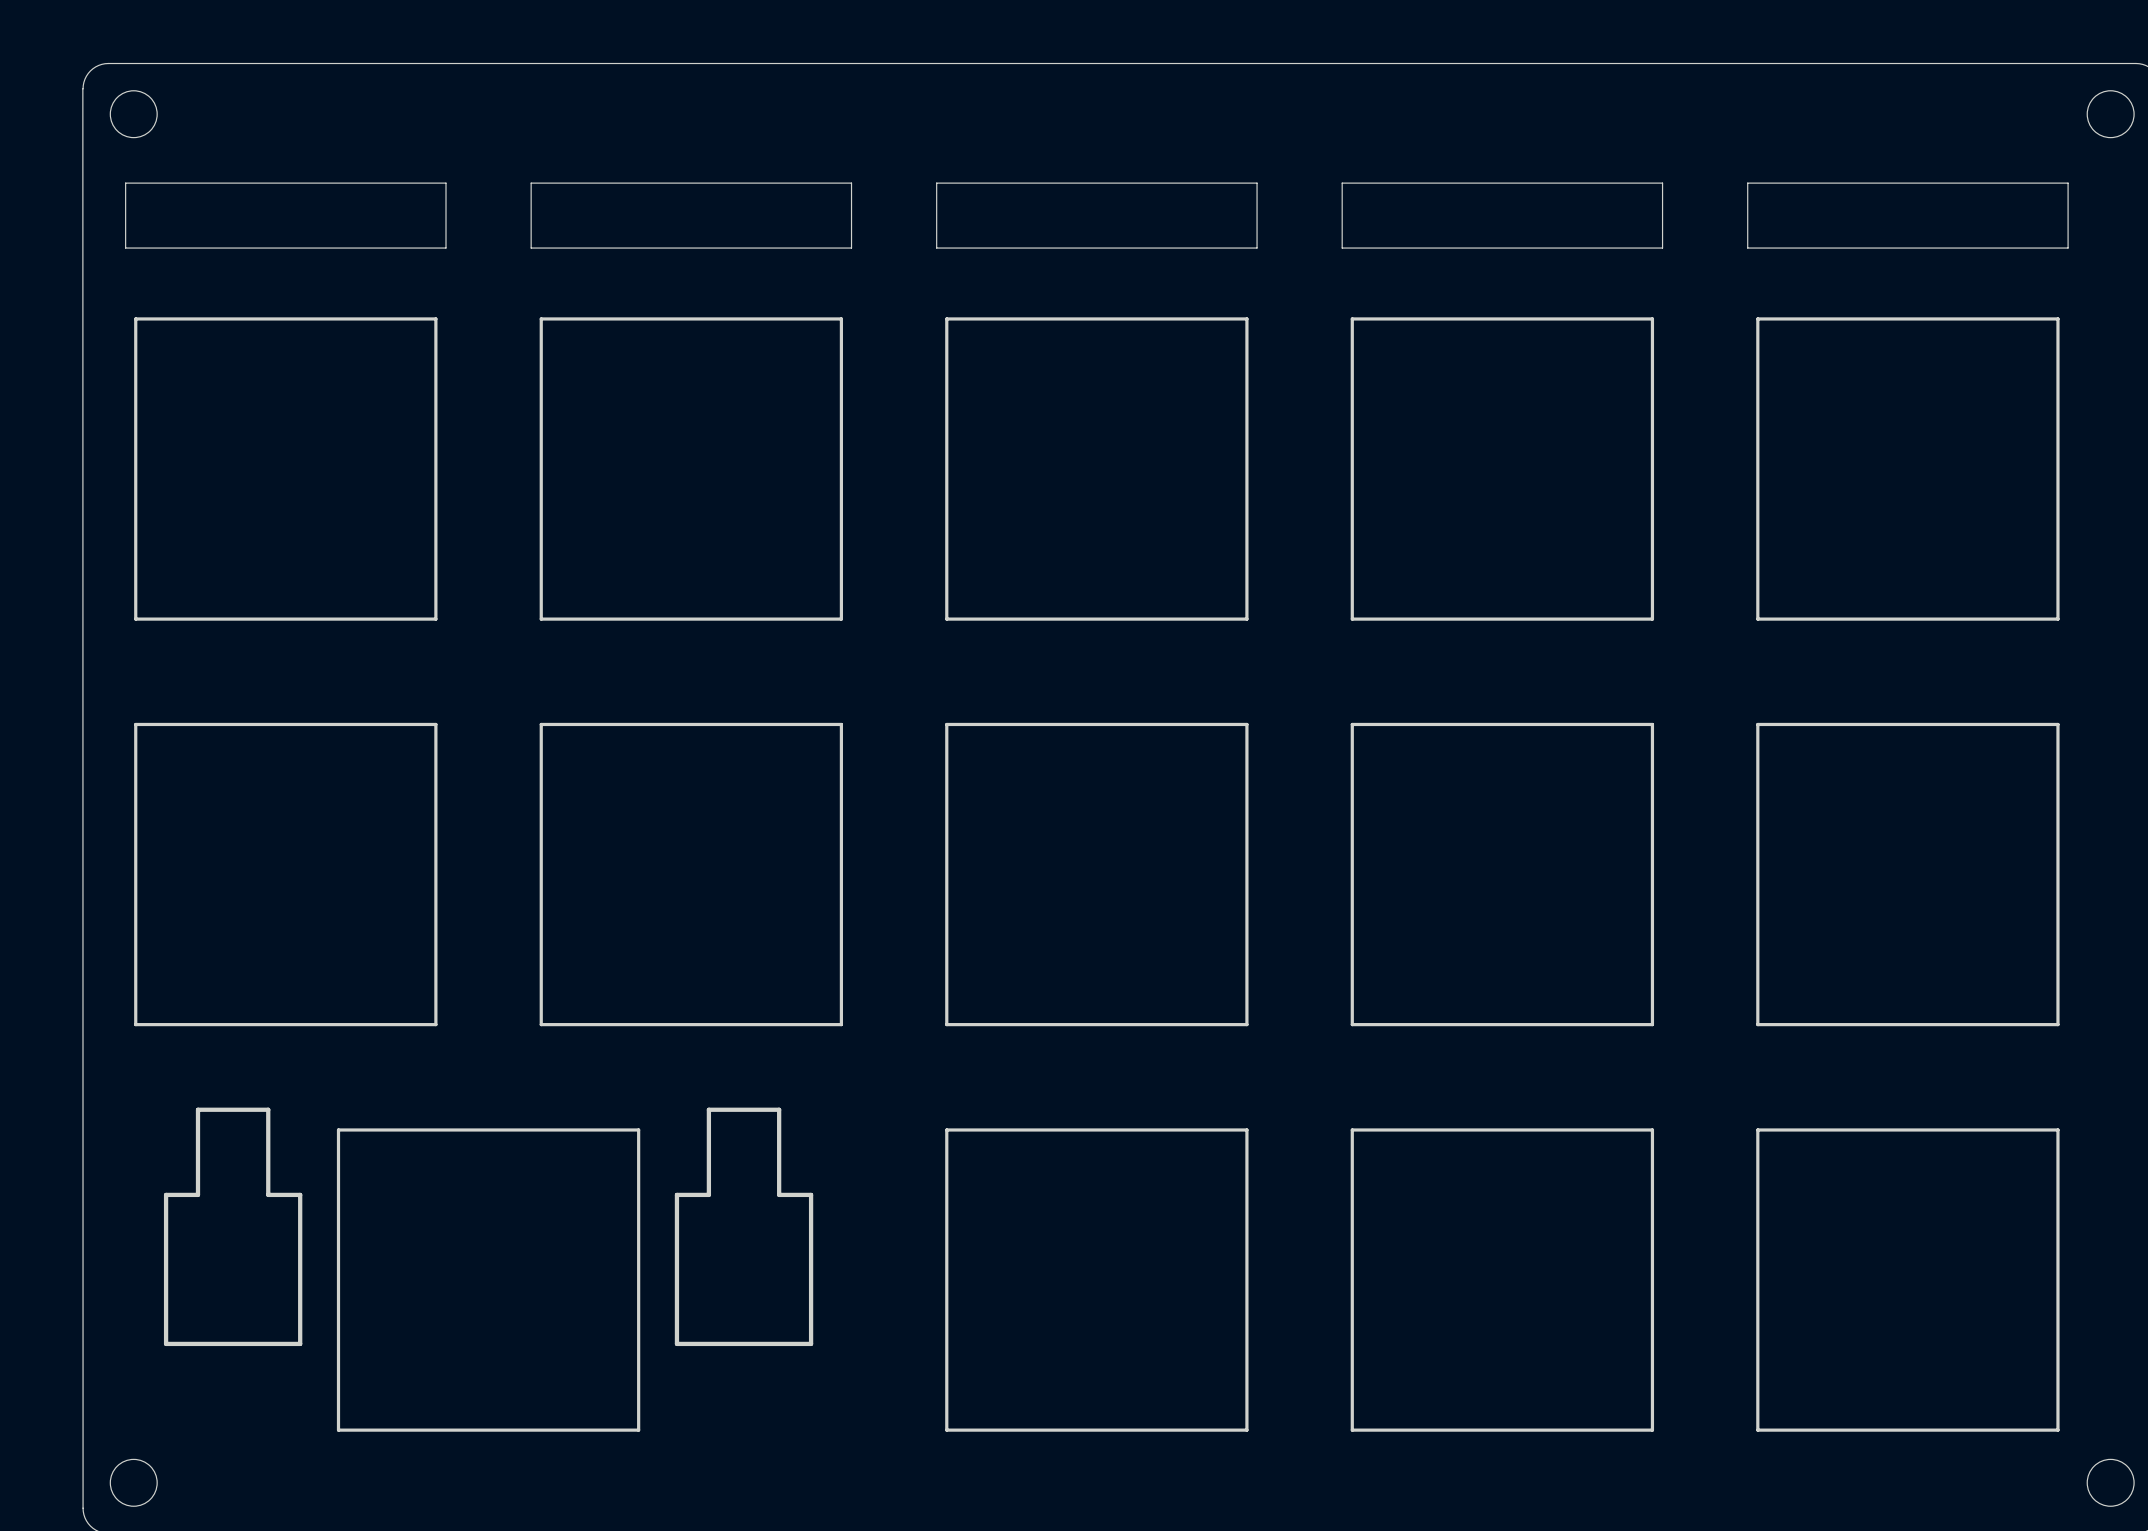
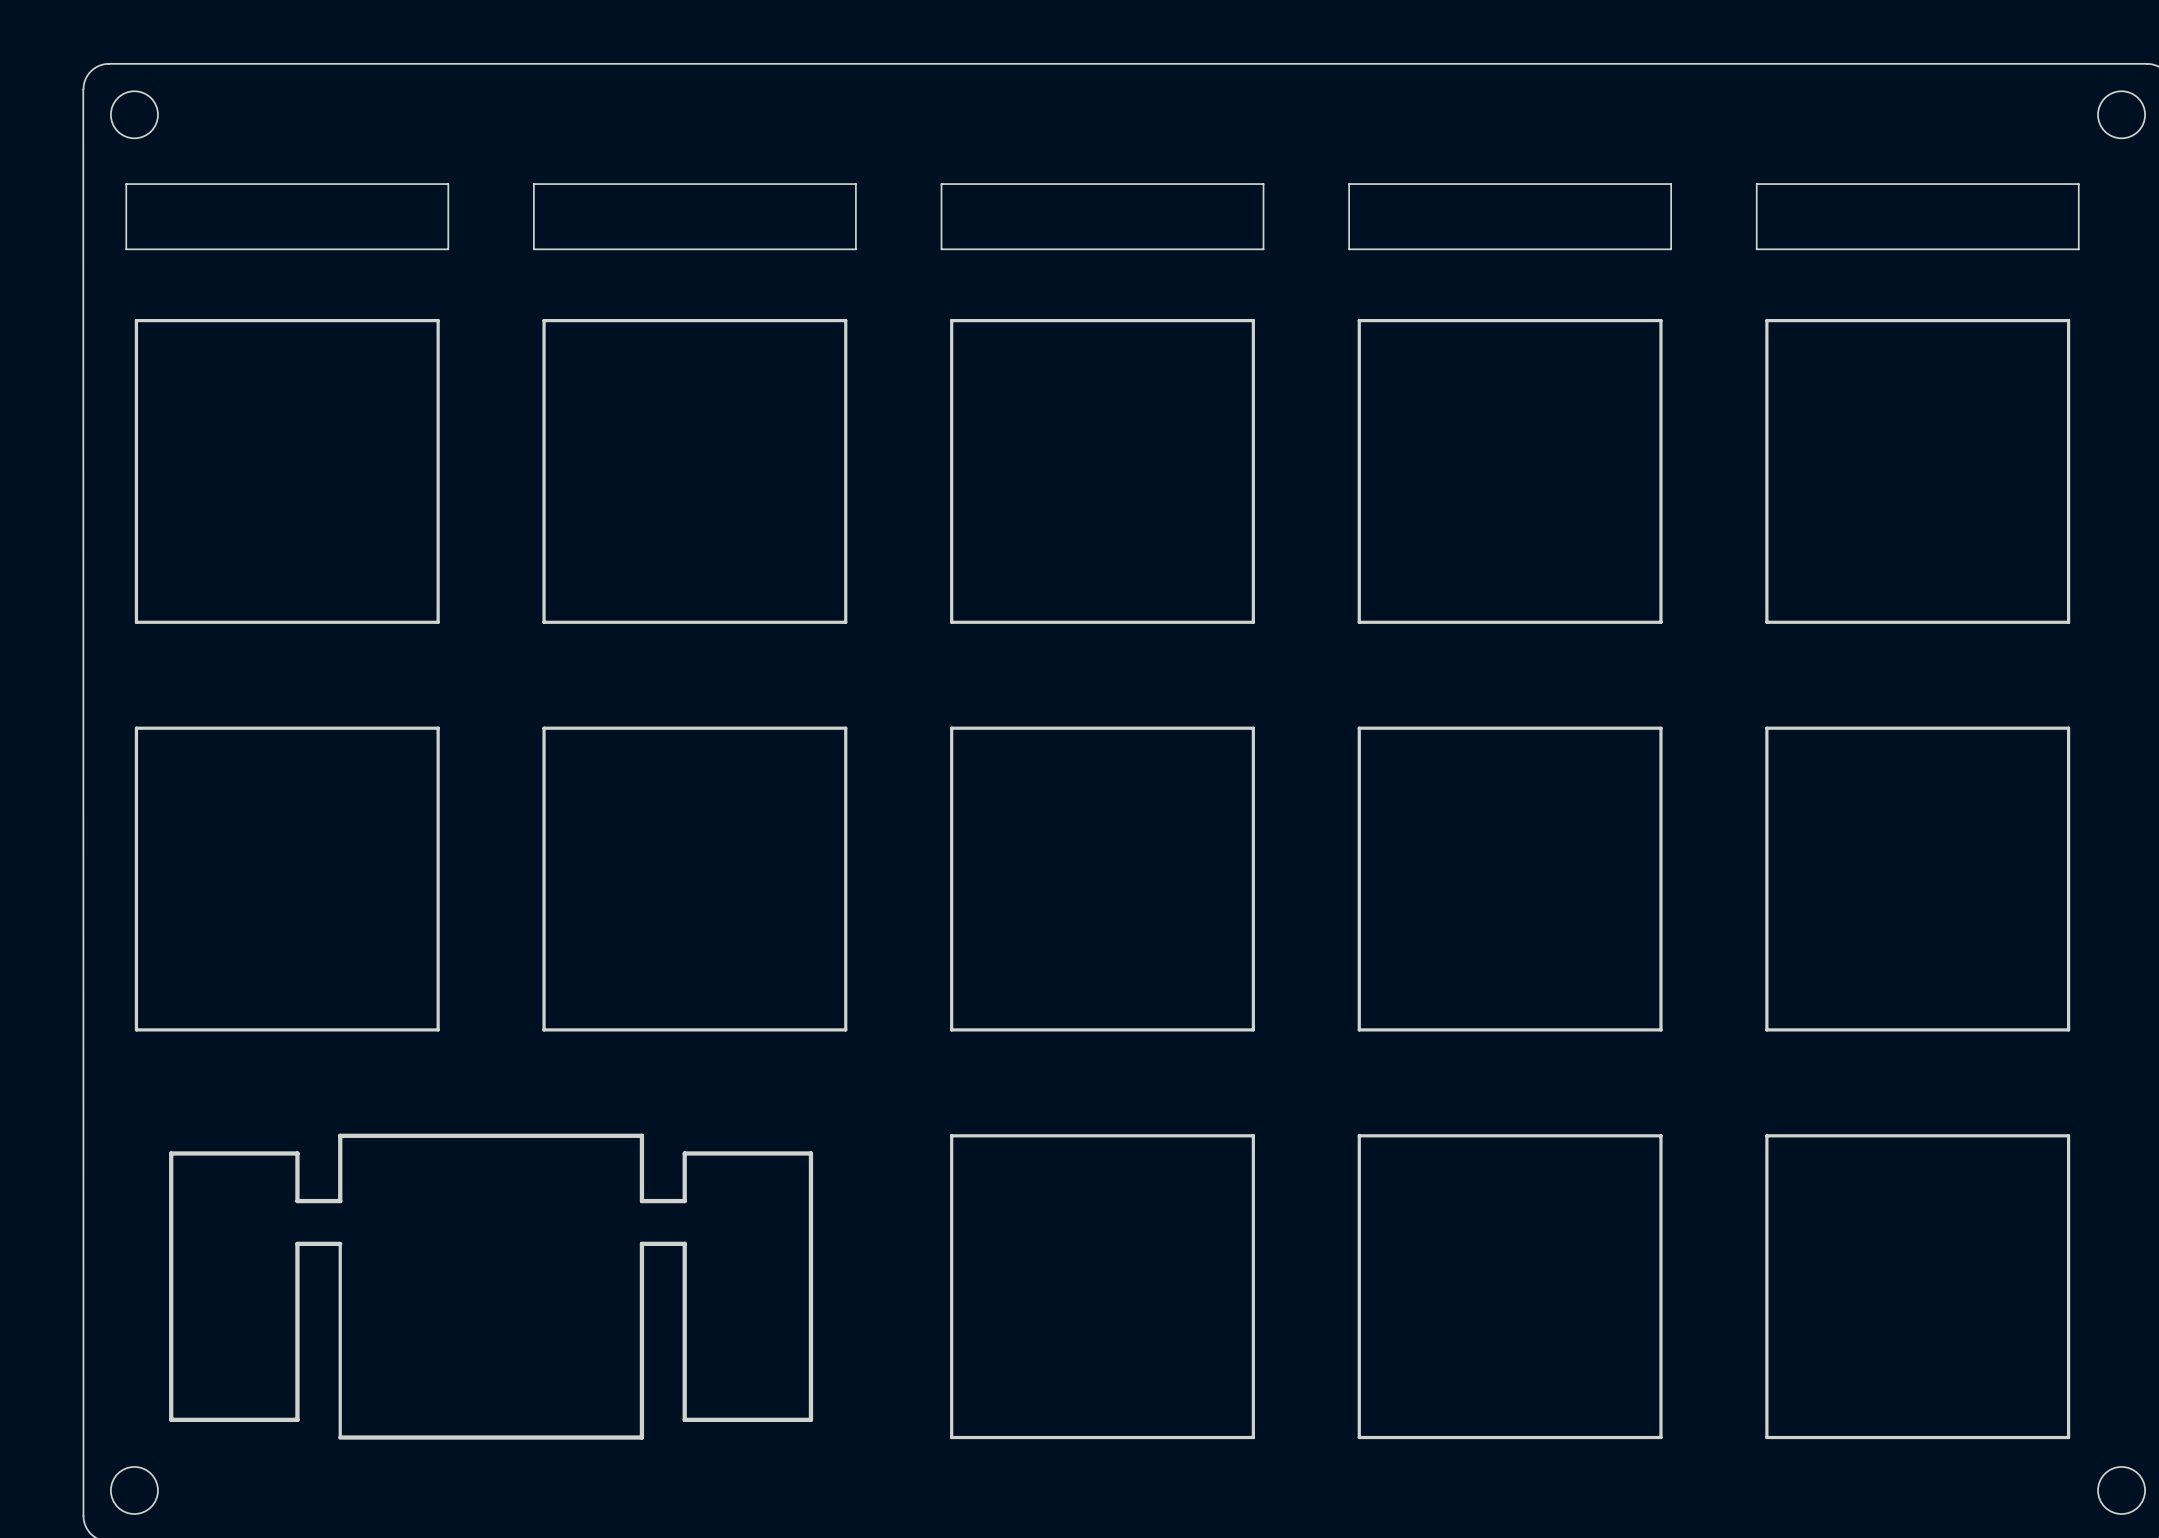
drawing: [163, 1107, 814, 1347] -> none
drawing shape: [336, 1128, 641, 1432] -> [169, 1133, 814, 1440]

